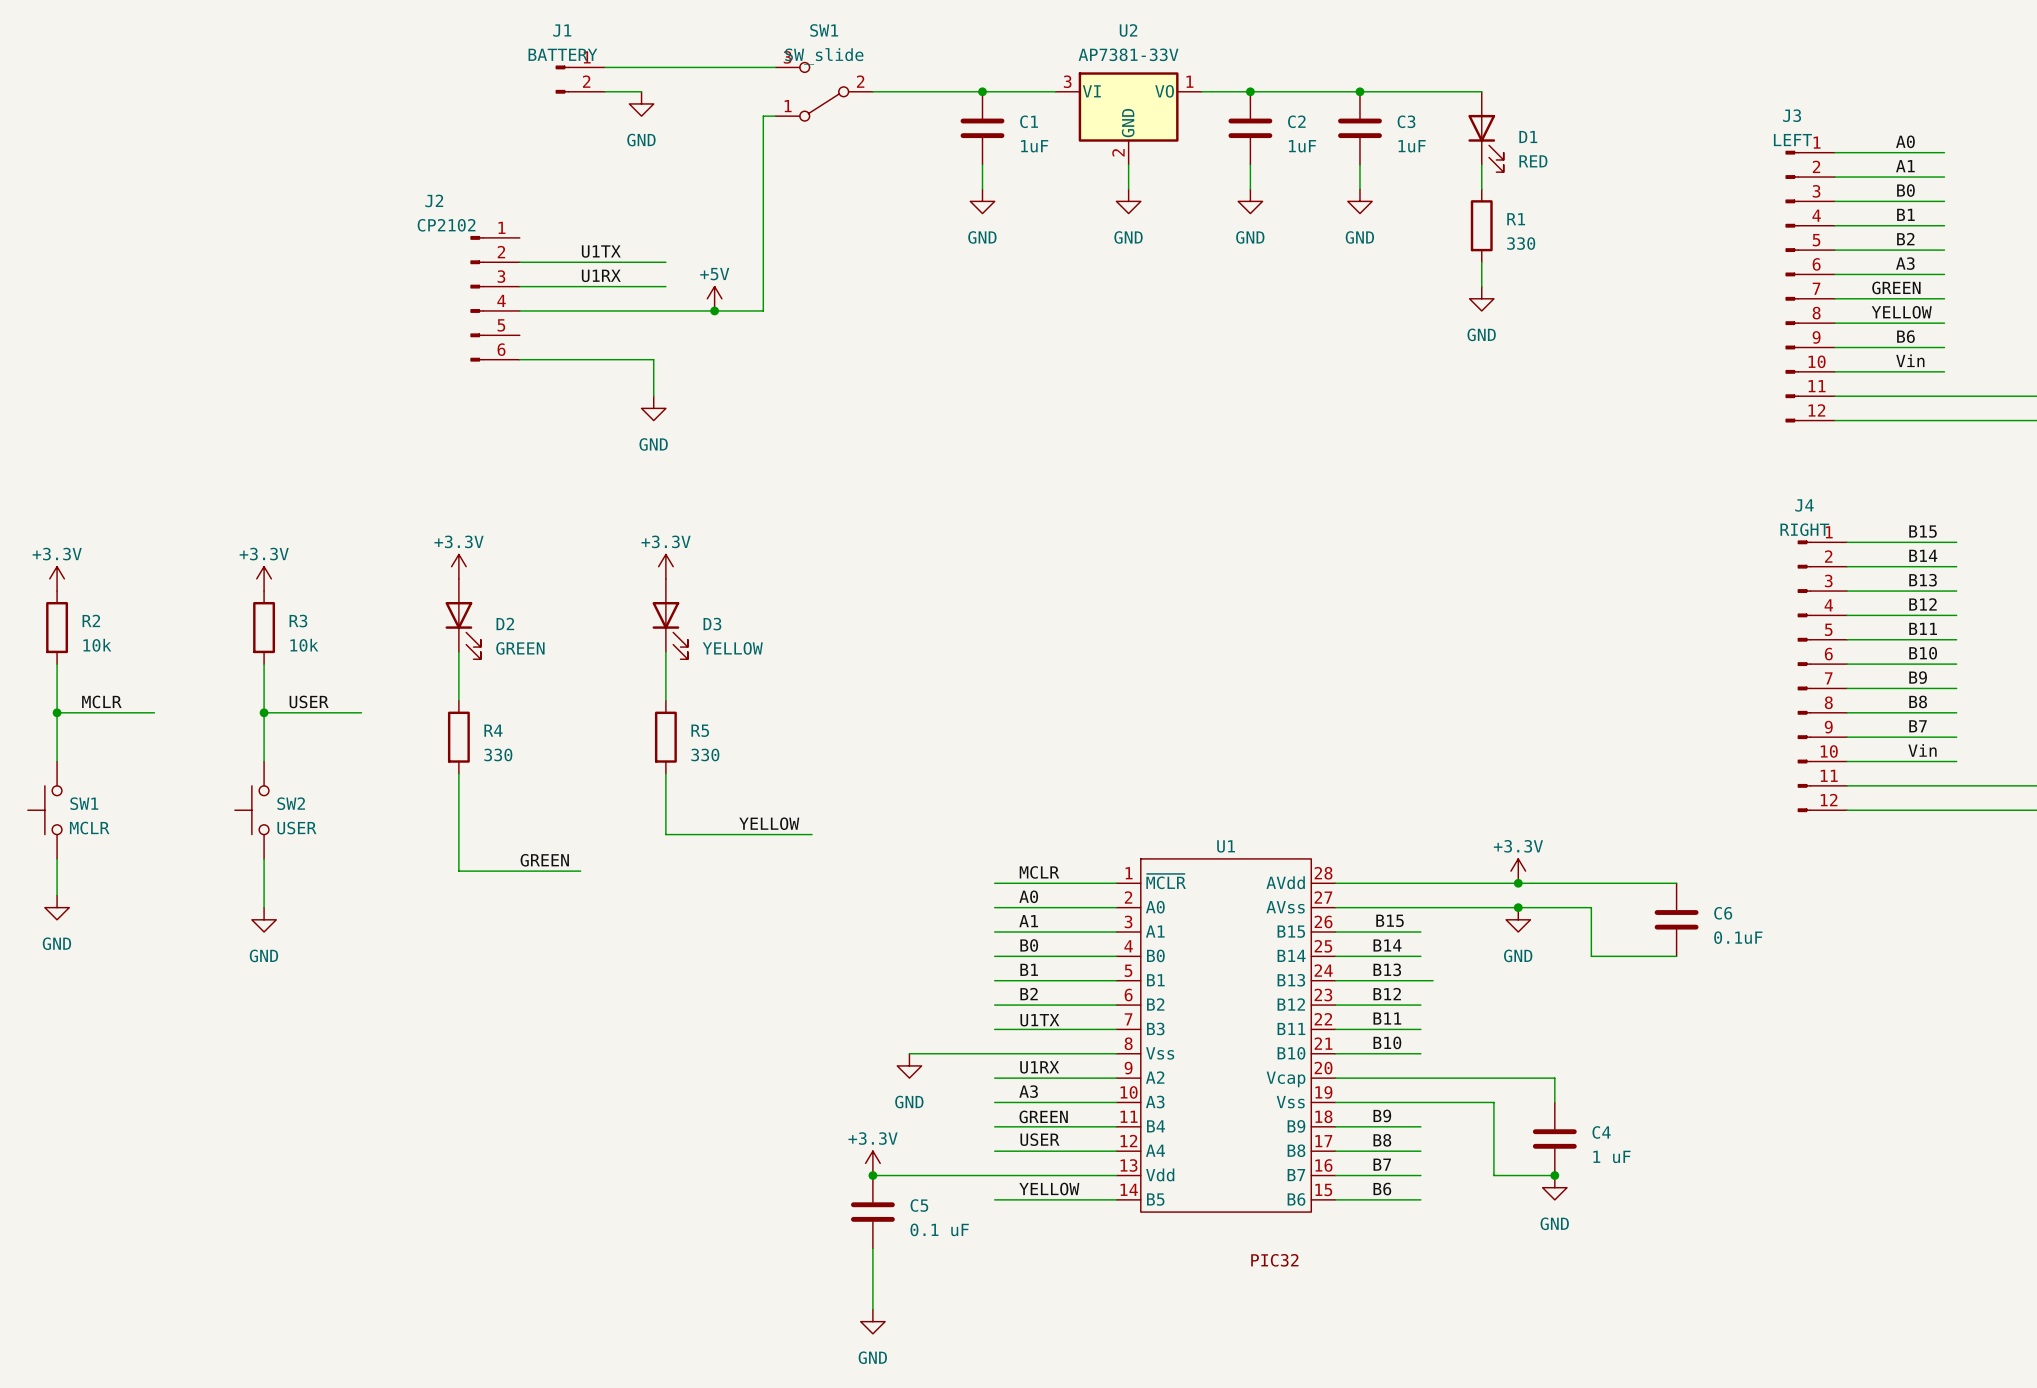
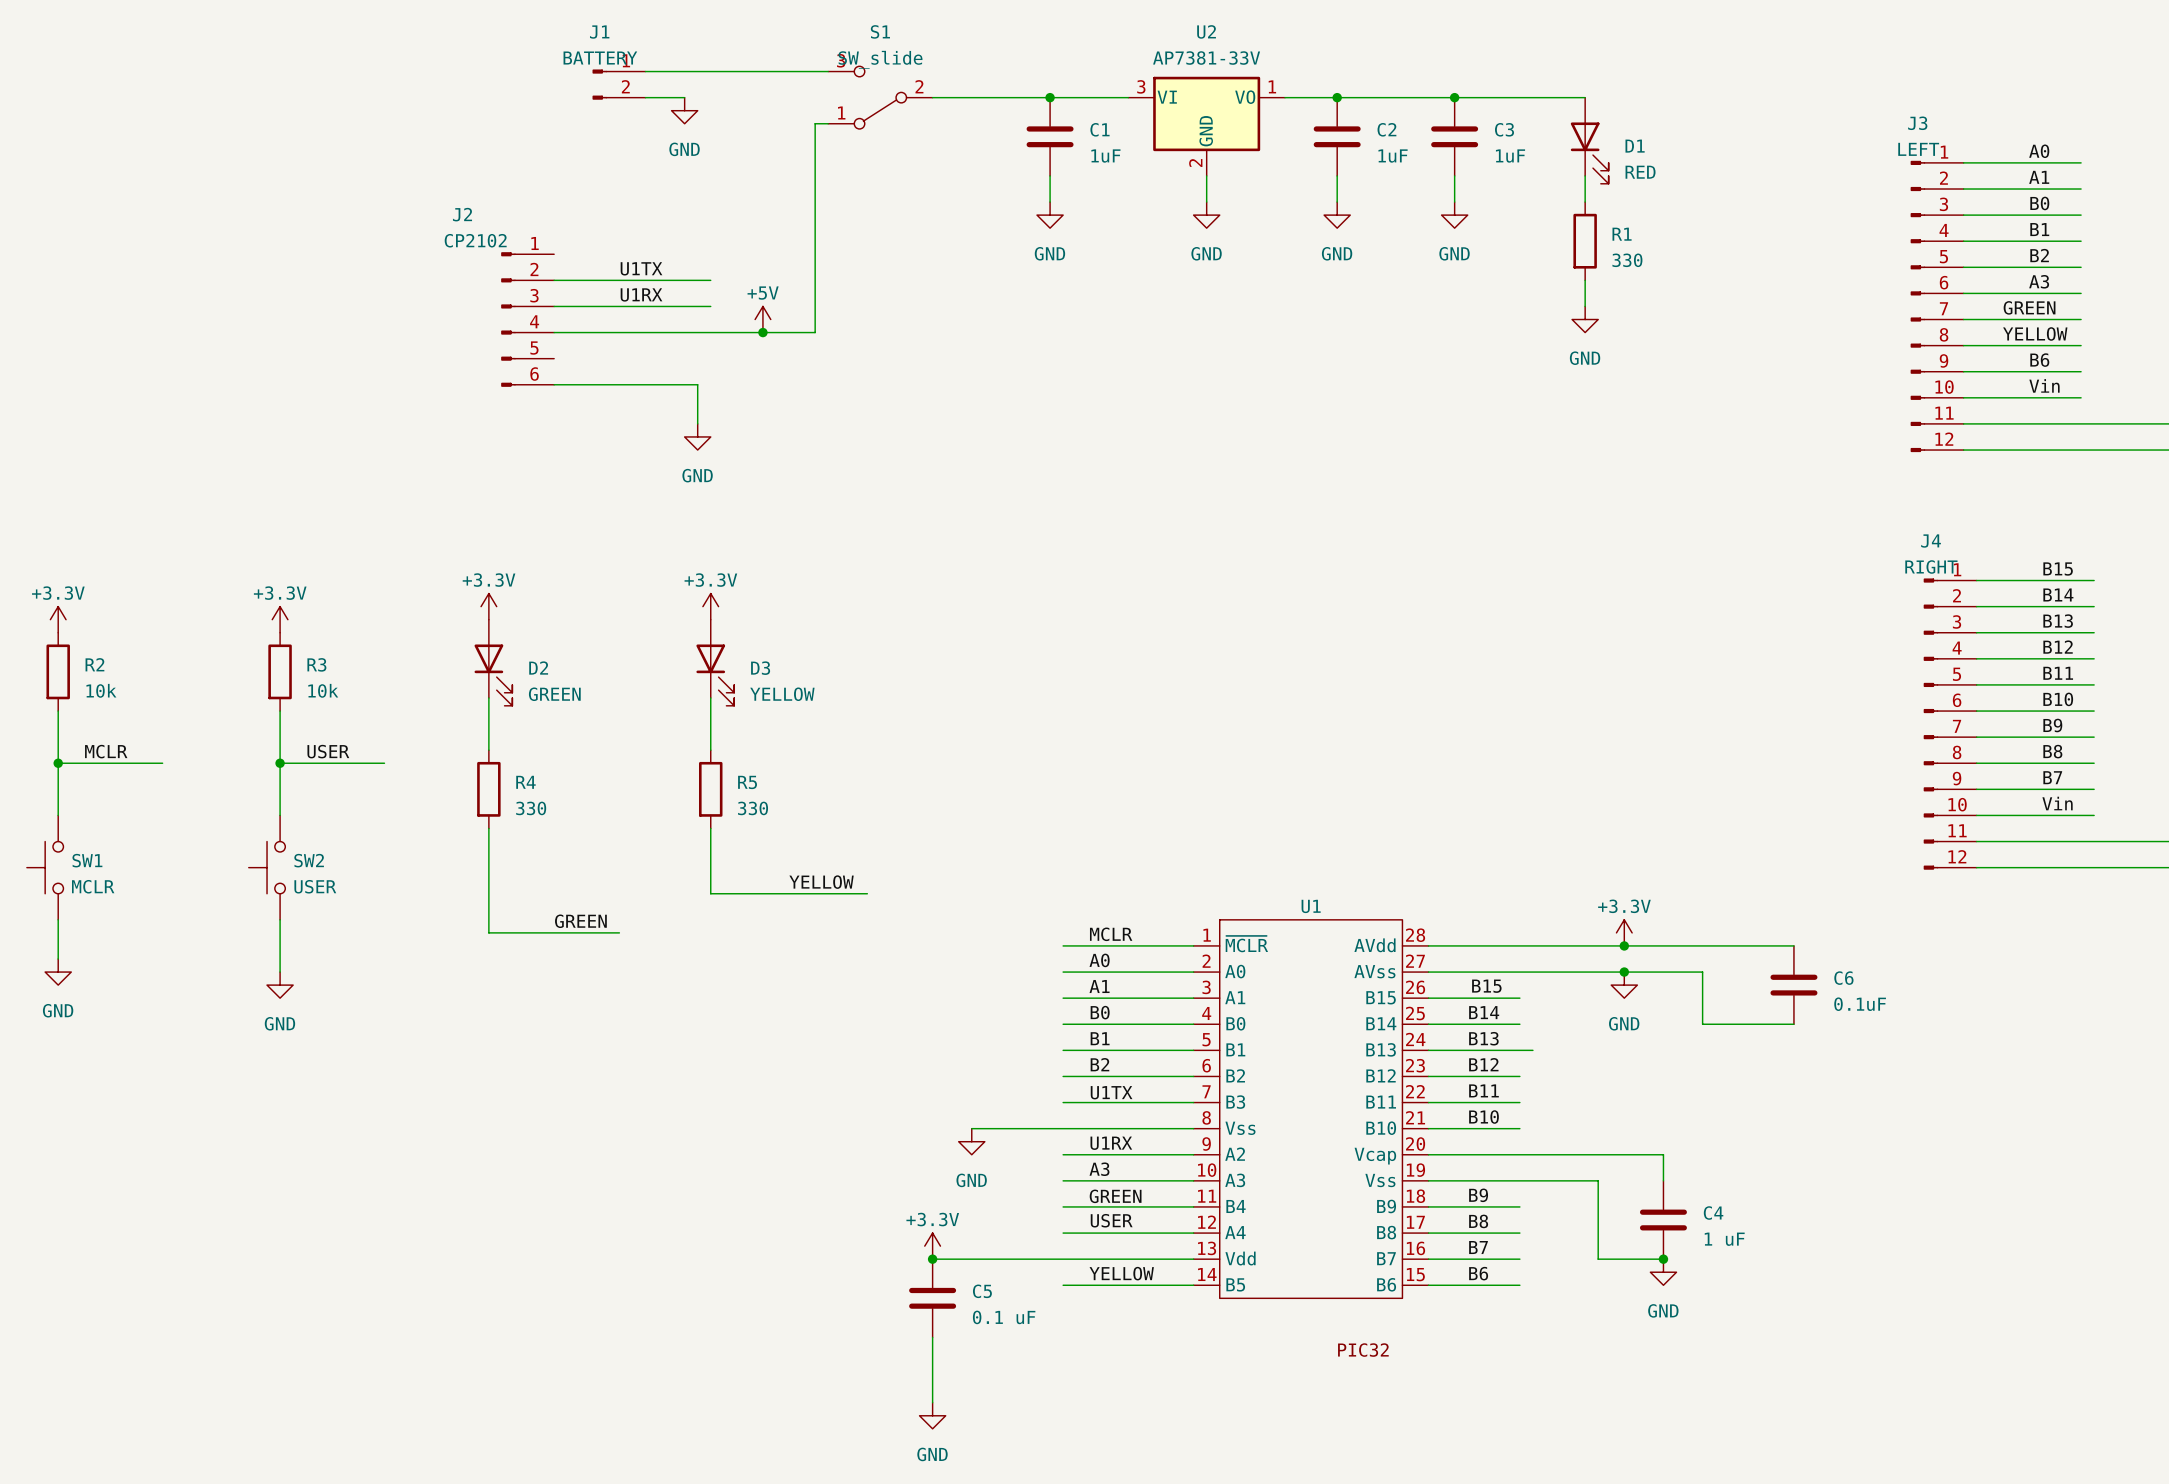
SW1 name: SW1 (824, 30) -> S1 (880, 31)

